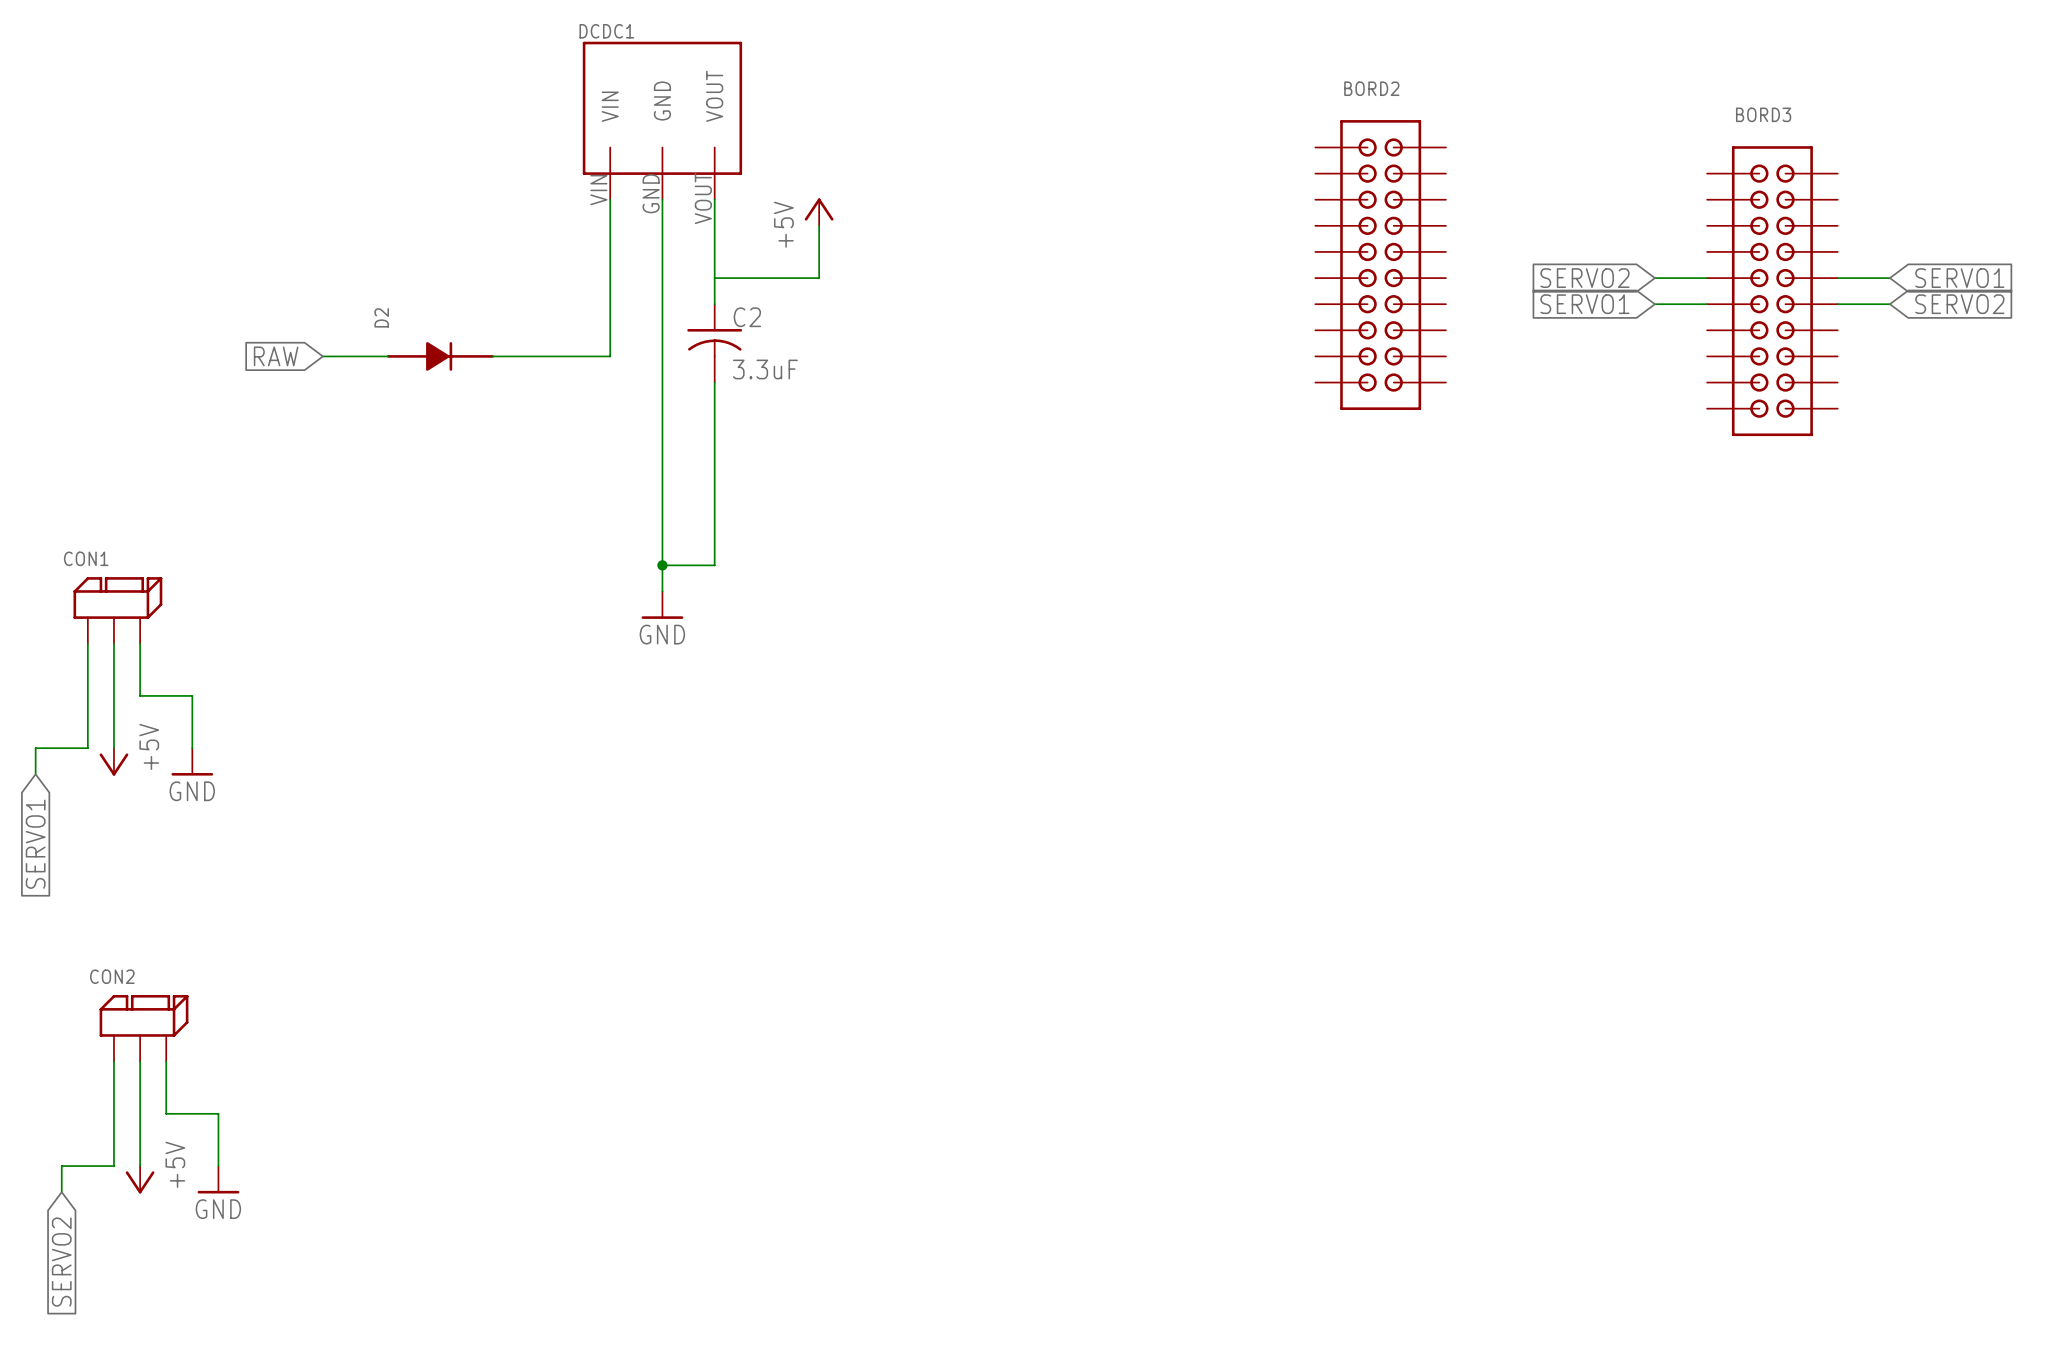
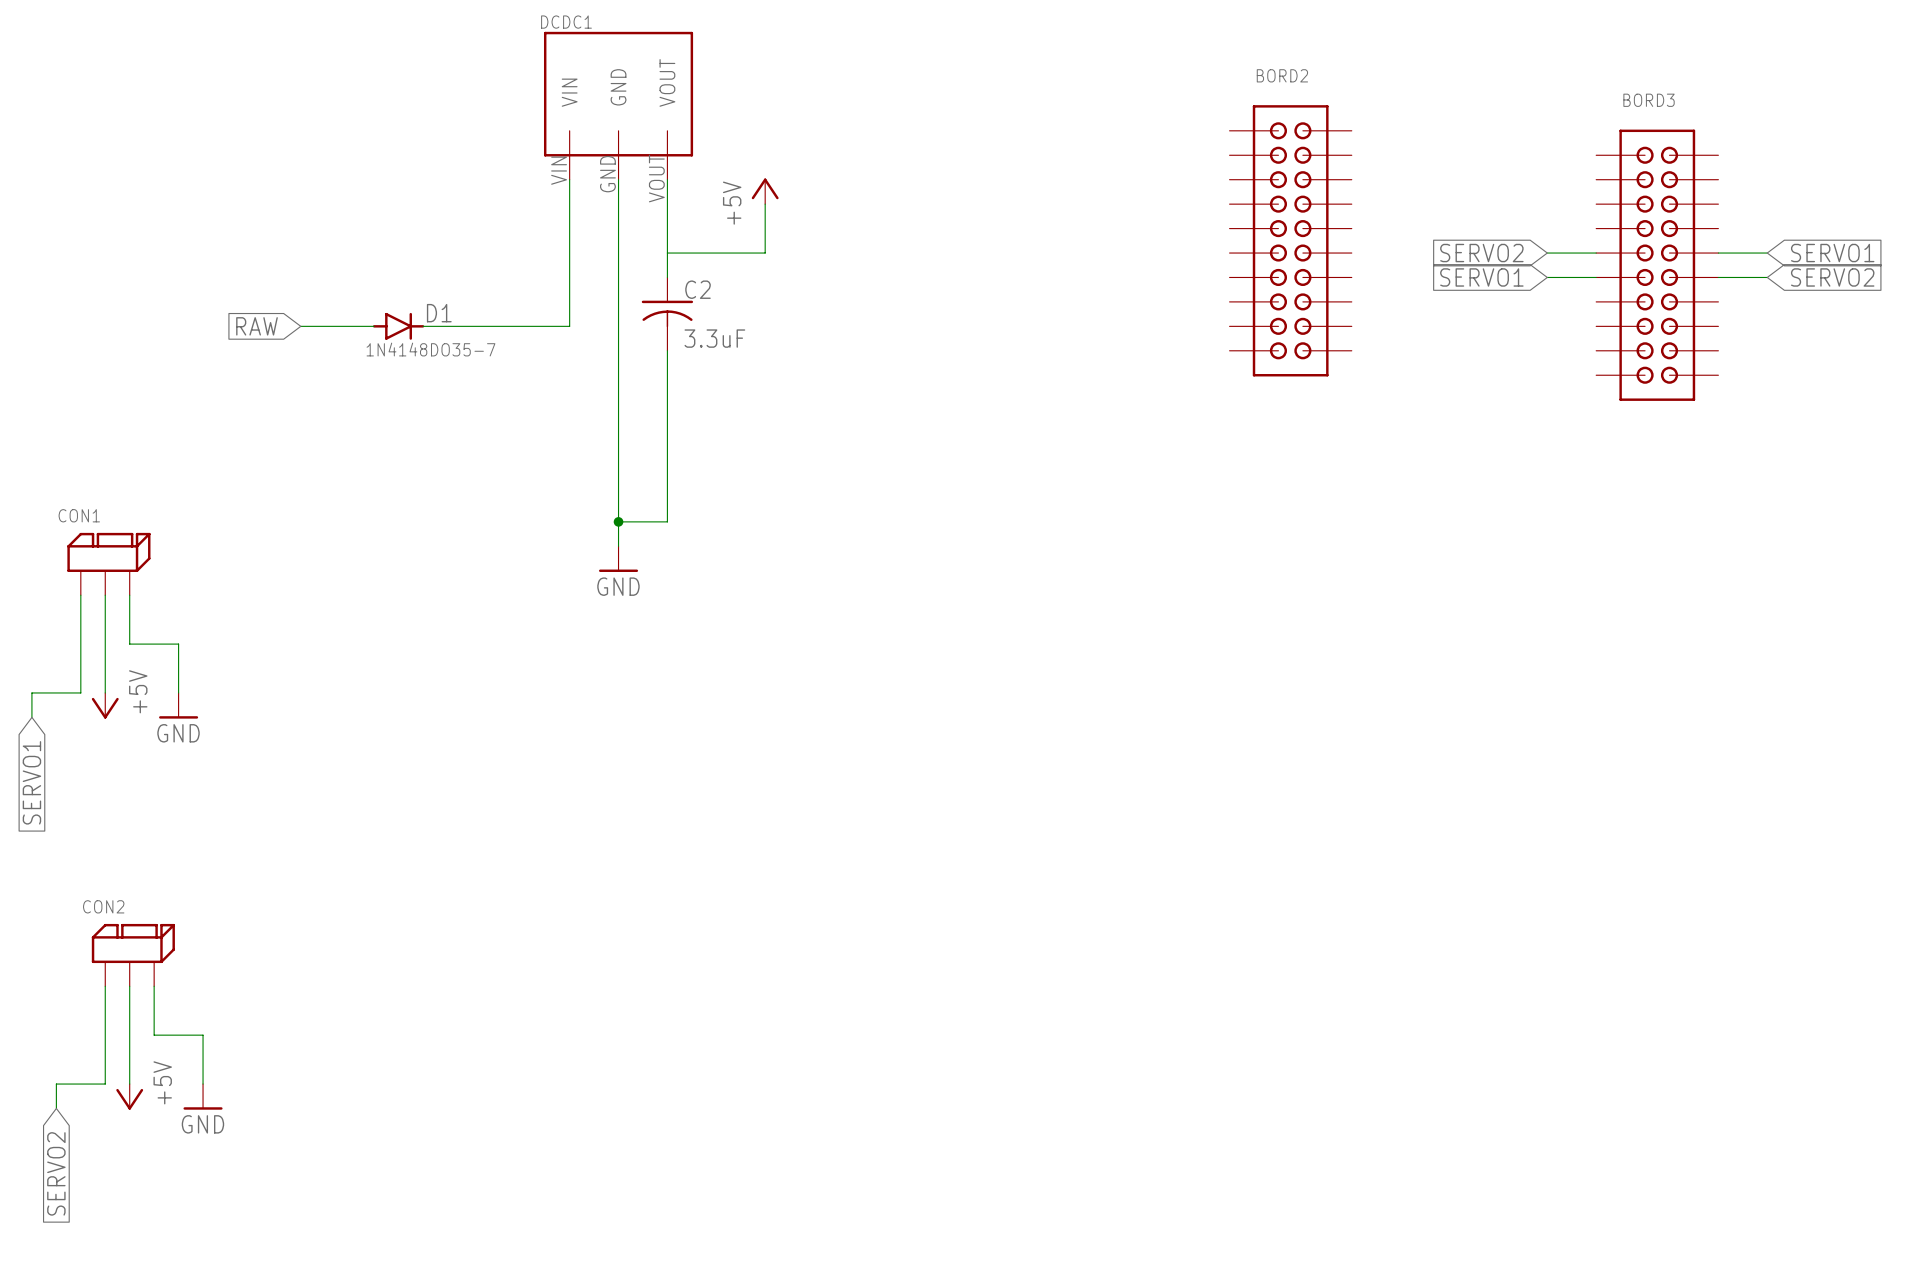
D1: none -> 1N4148DO35-7 (398, 326)
D2: (440, 356) -> none

